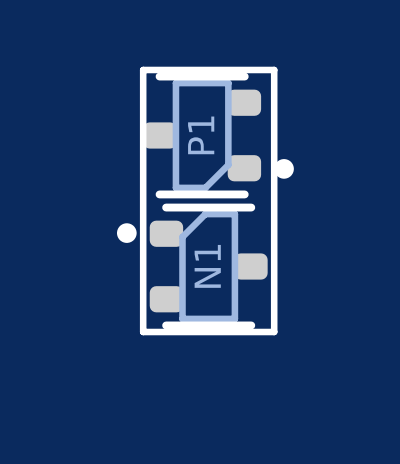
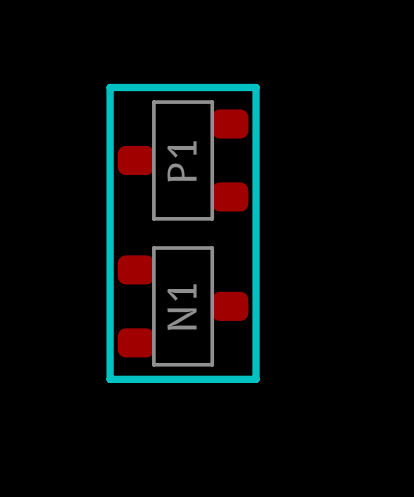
P1 footprint: [143, 72, 294, 199] -> [117, 100, 249, 221]
N1 footprint: [116, 203, 268, 330] -> [117, 246, 249, 367]

